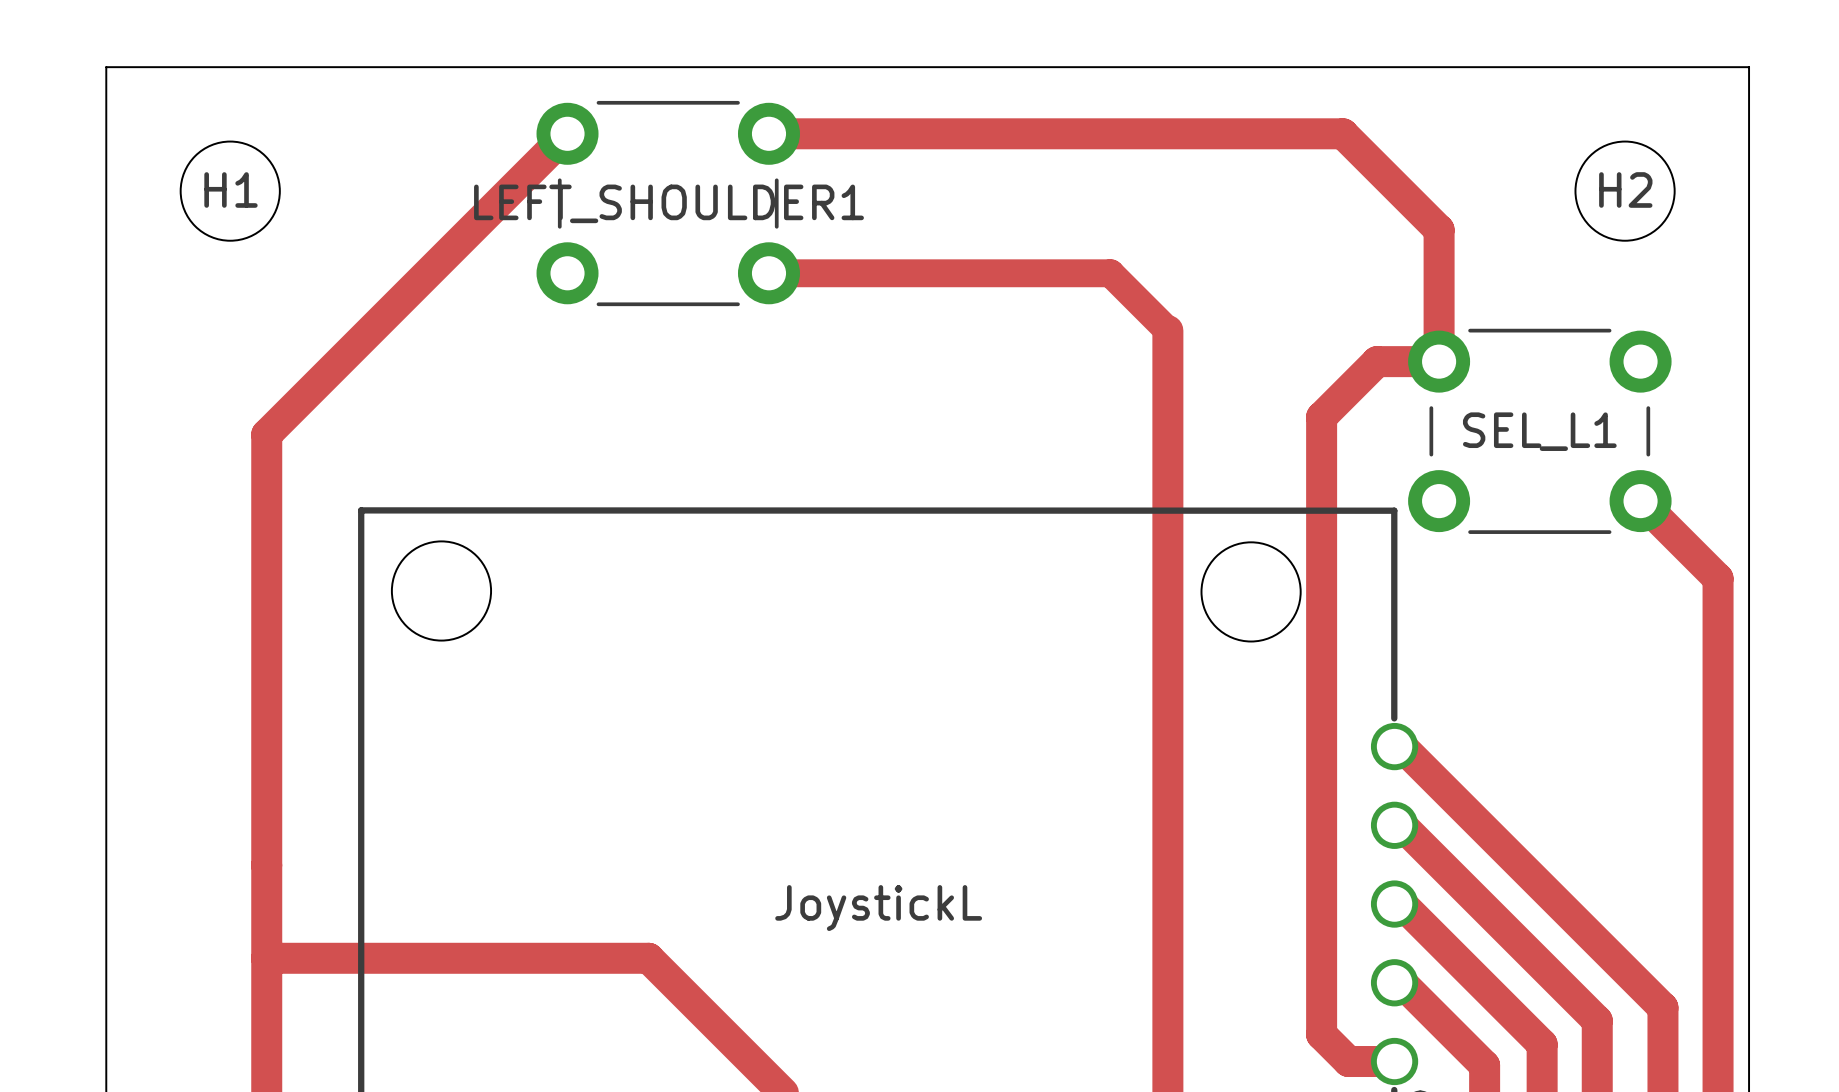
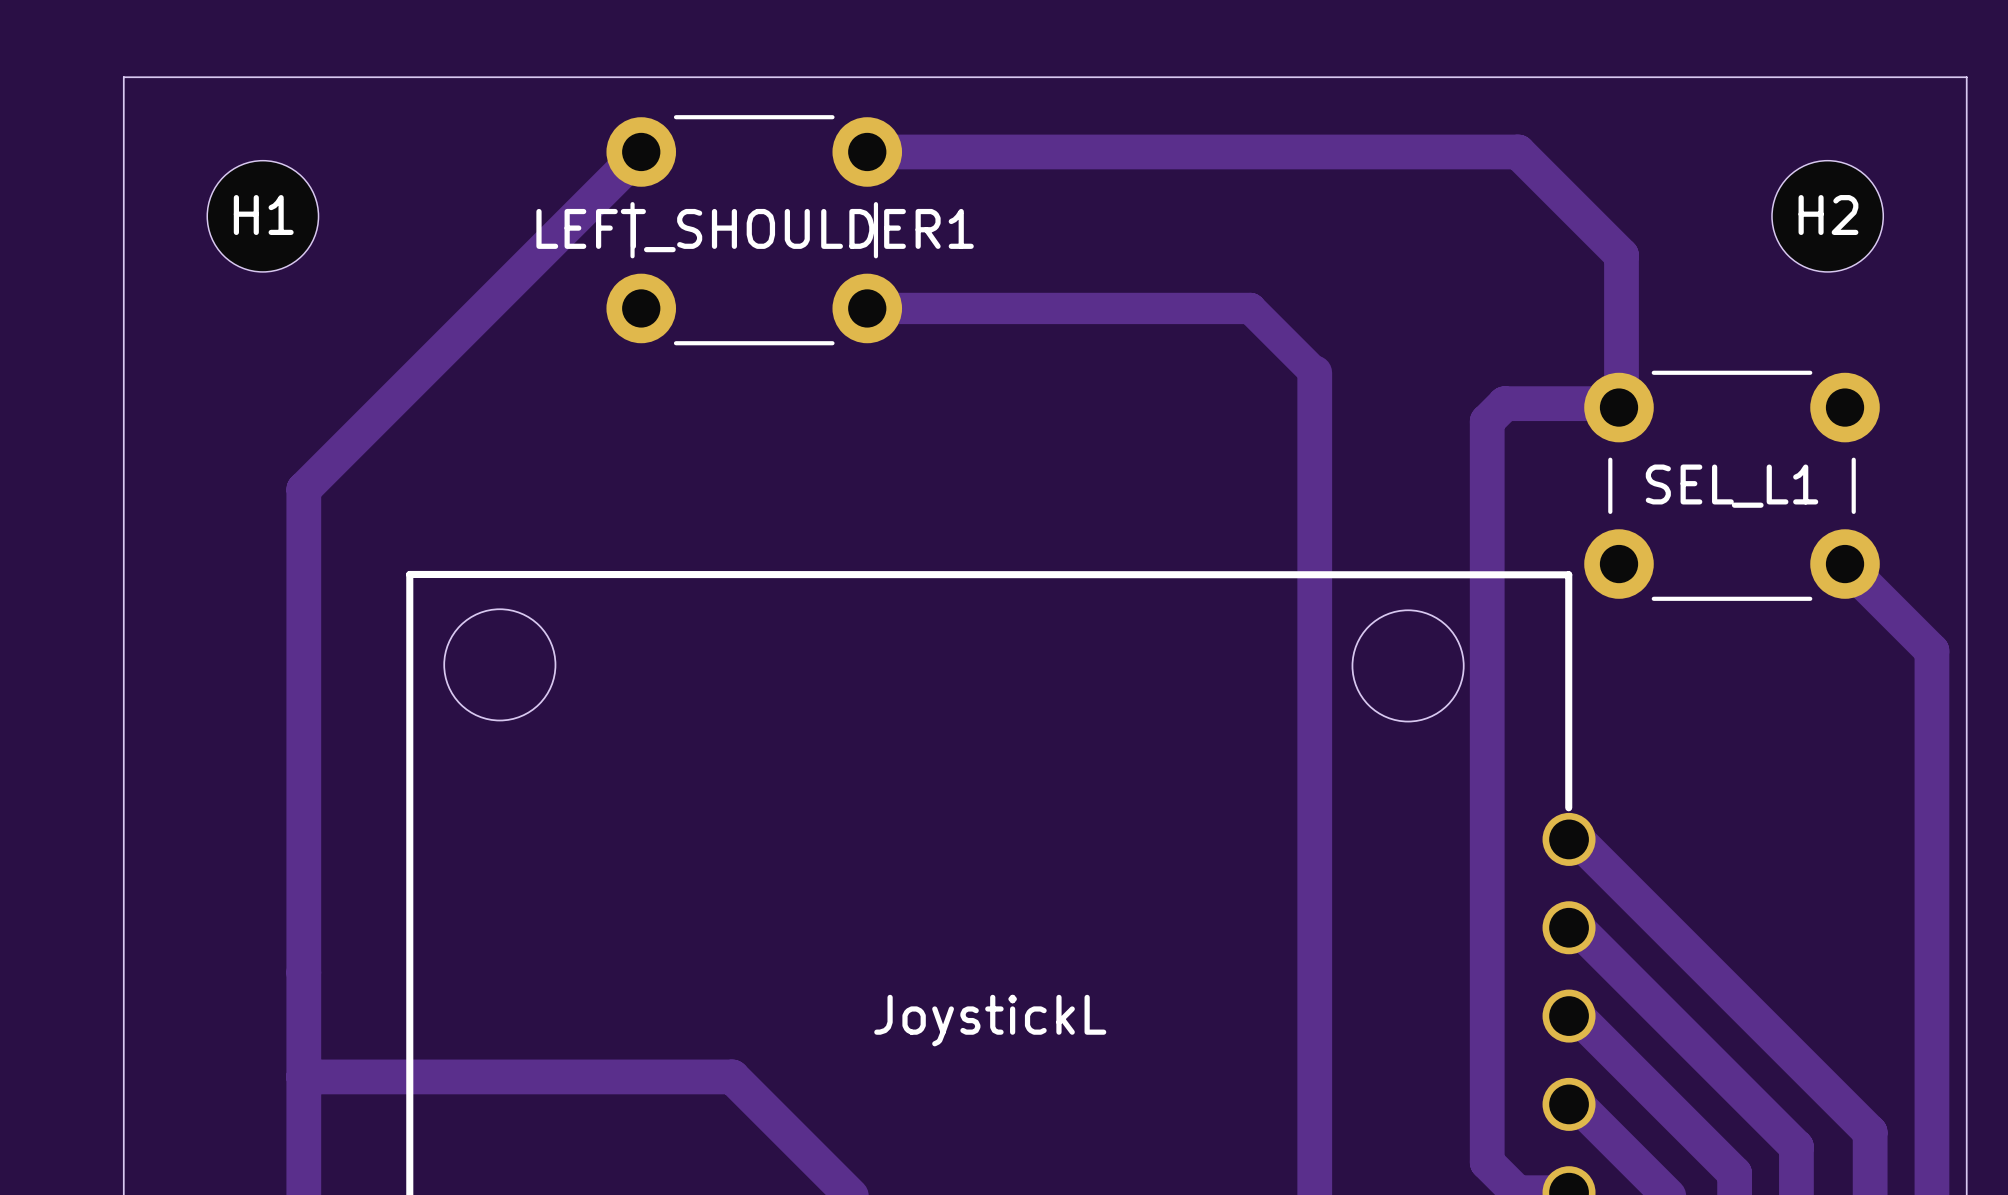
track: (1343, 133) (1439, 229) (1439, 361) (1377, 361) (1321, 417) -> (1511, 151) (1518, 151) (1621, 255) (1621, 404)
track: none -> (1620, 403) (1504, 403) (1487, 421) (1487, 469)

